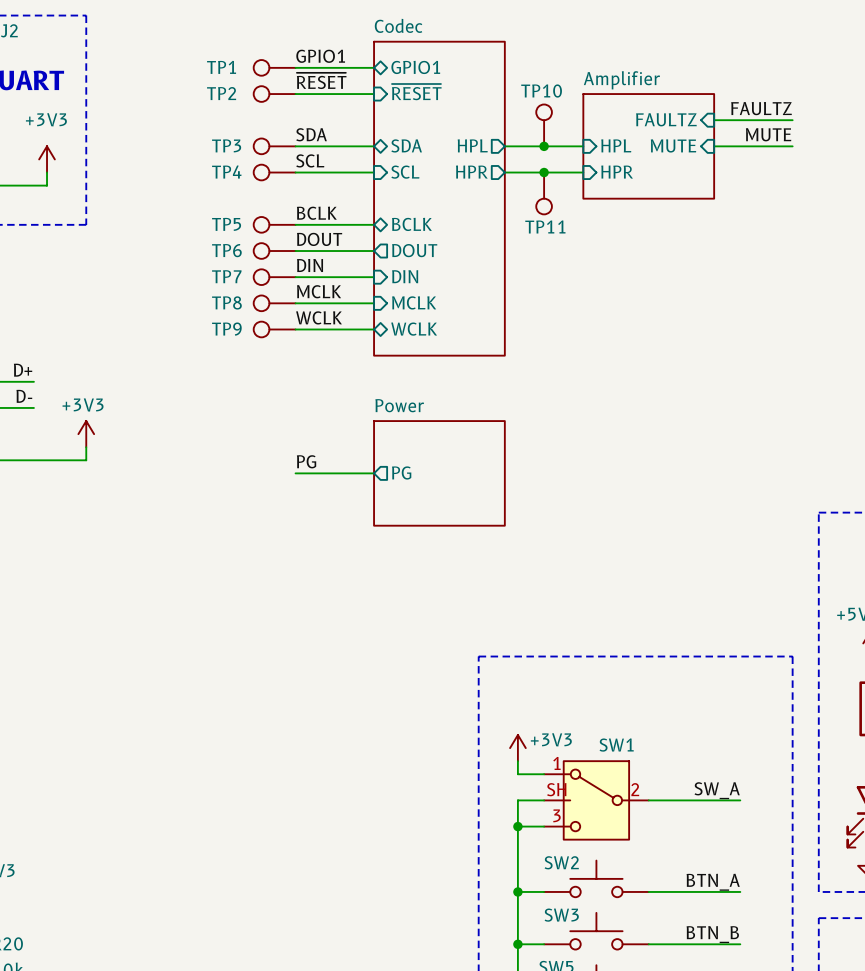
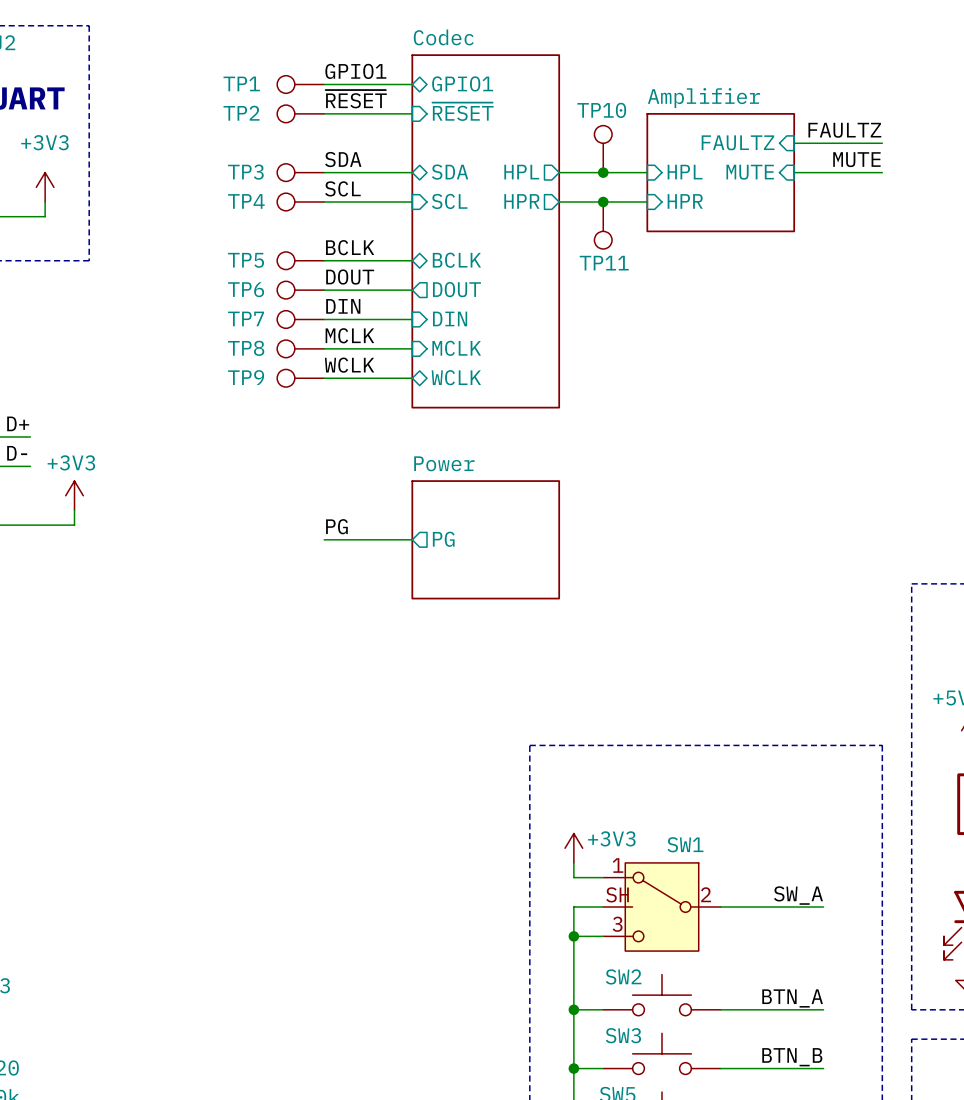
power symbol position: +3V3 (86, 434) -> +3V3 (74, 495)
wire: (86, 447) (86, 460) (73, 460) -> (74, 510) (74, 525)

